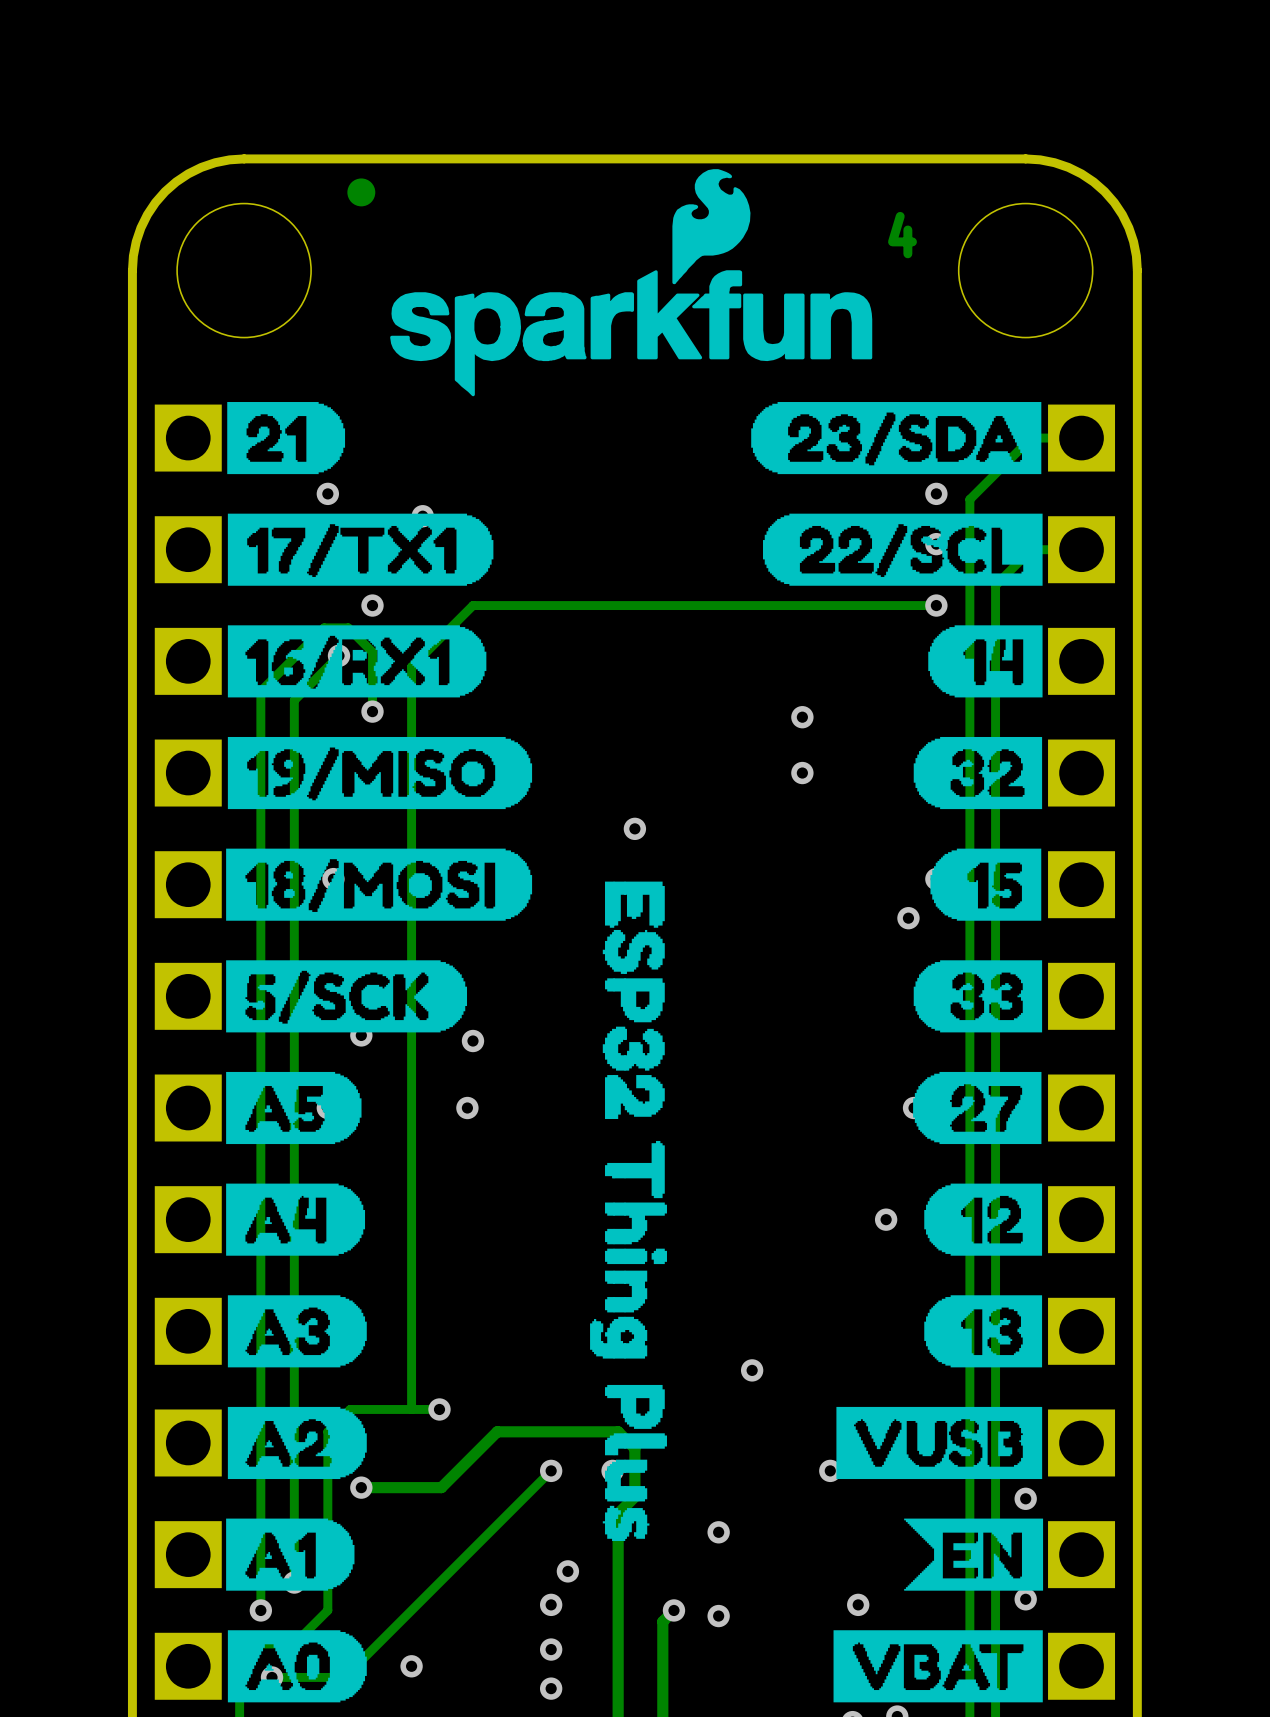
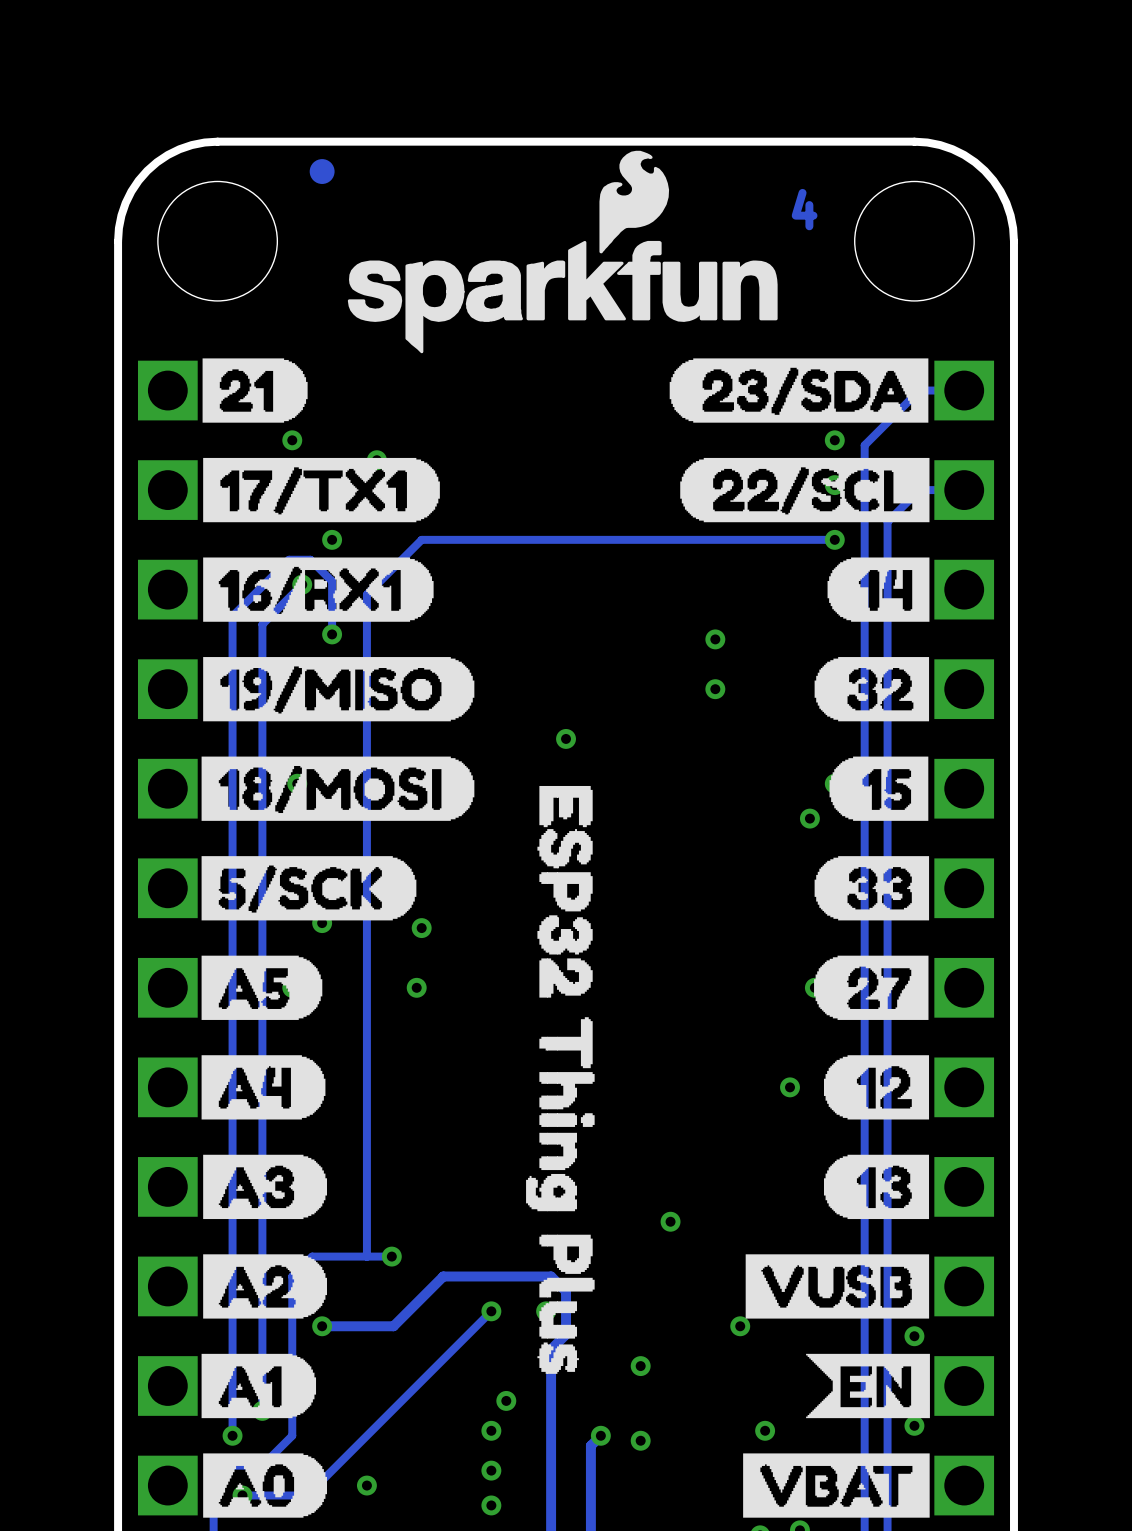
via position: (830, 1470) -> (740, 1326)

